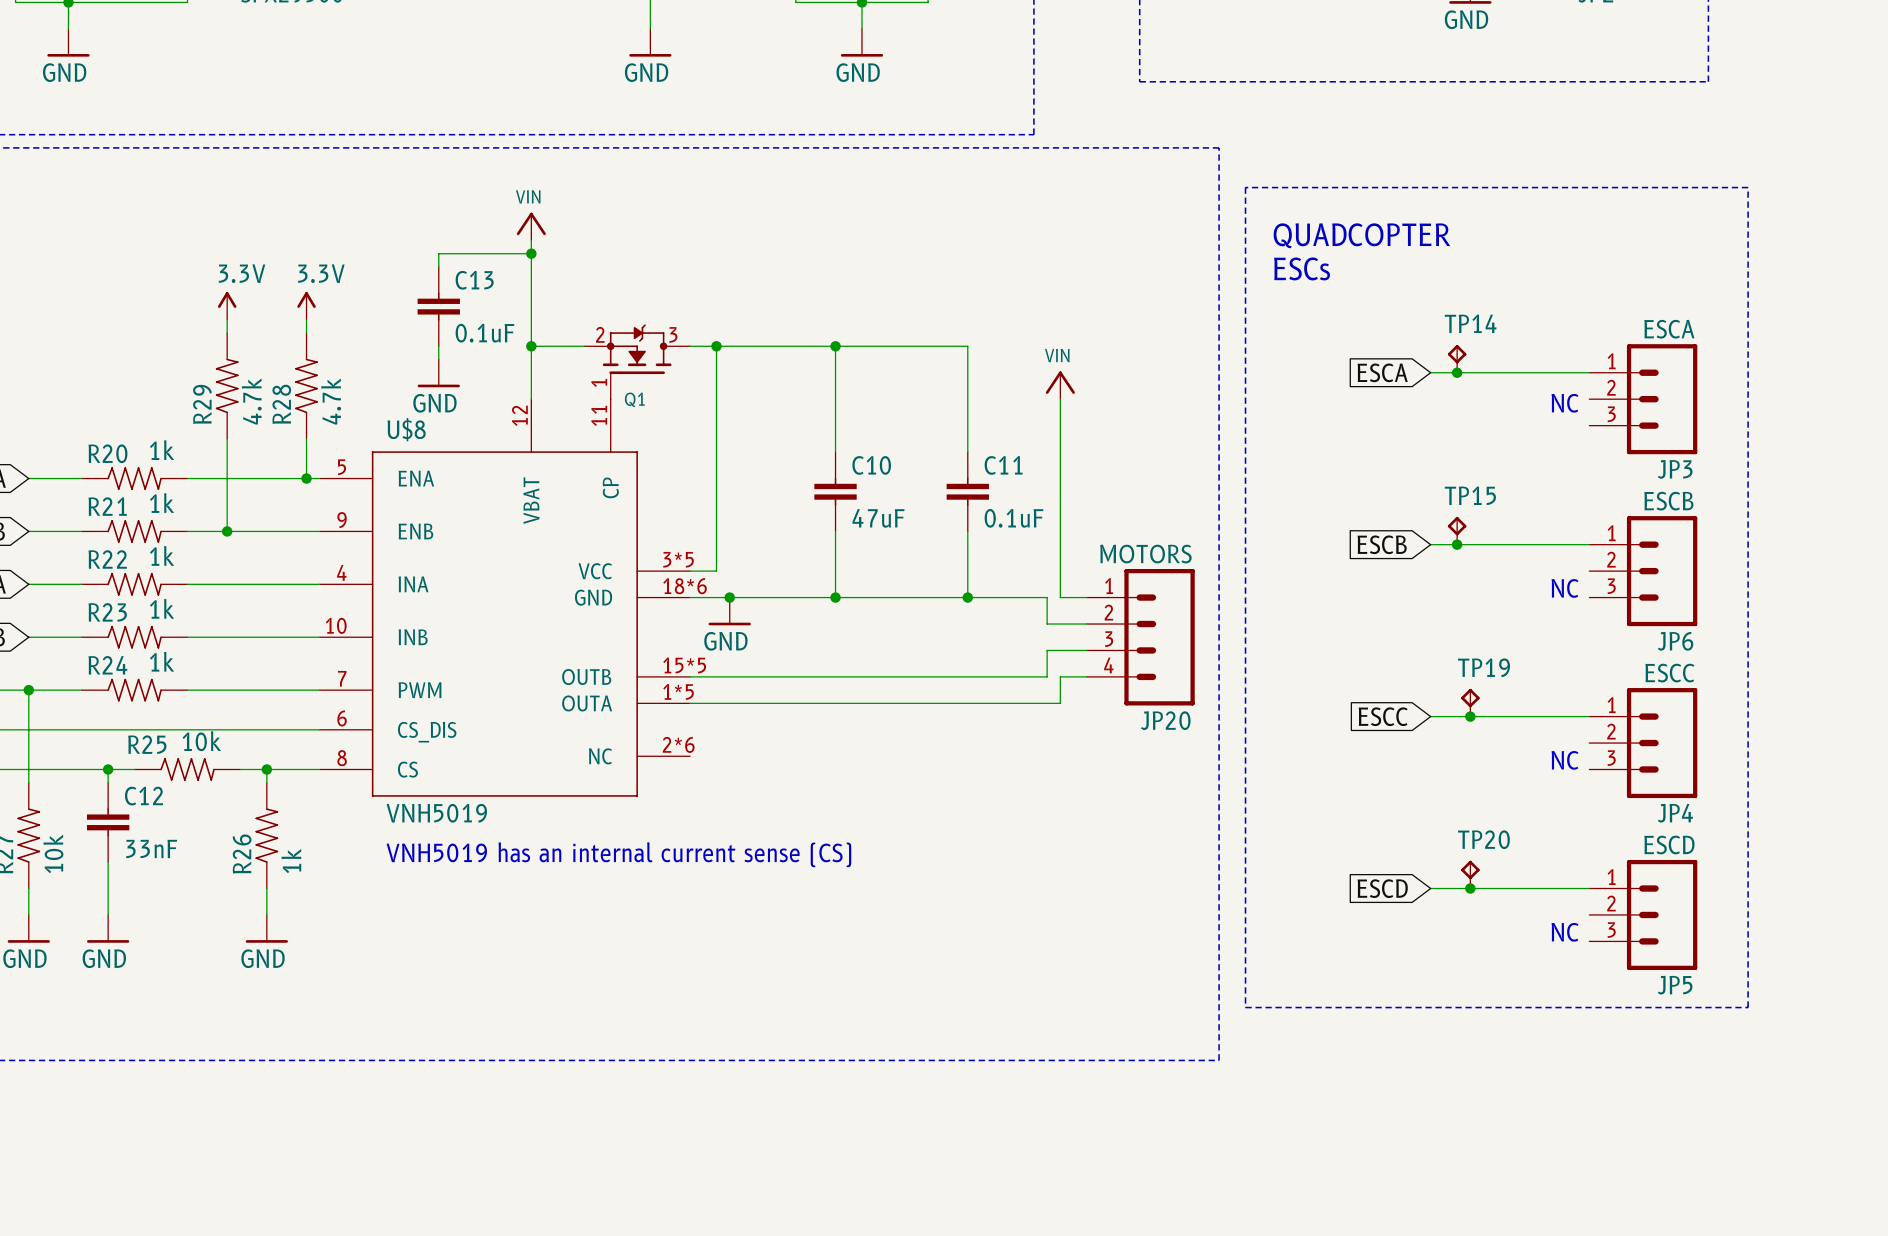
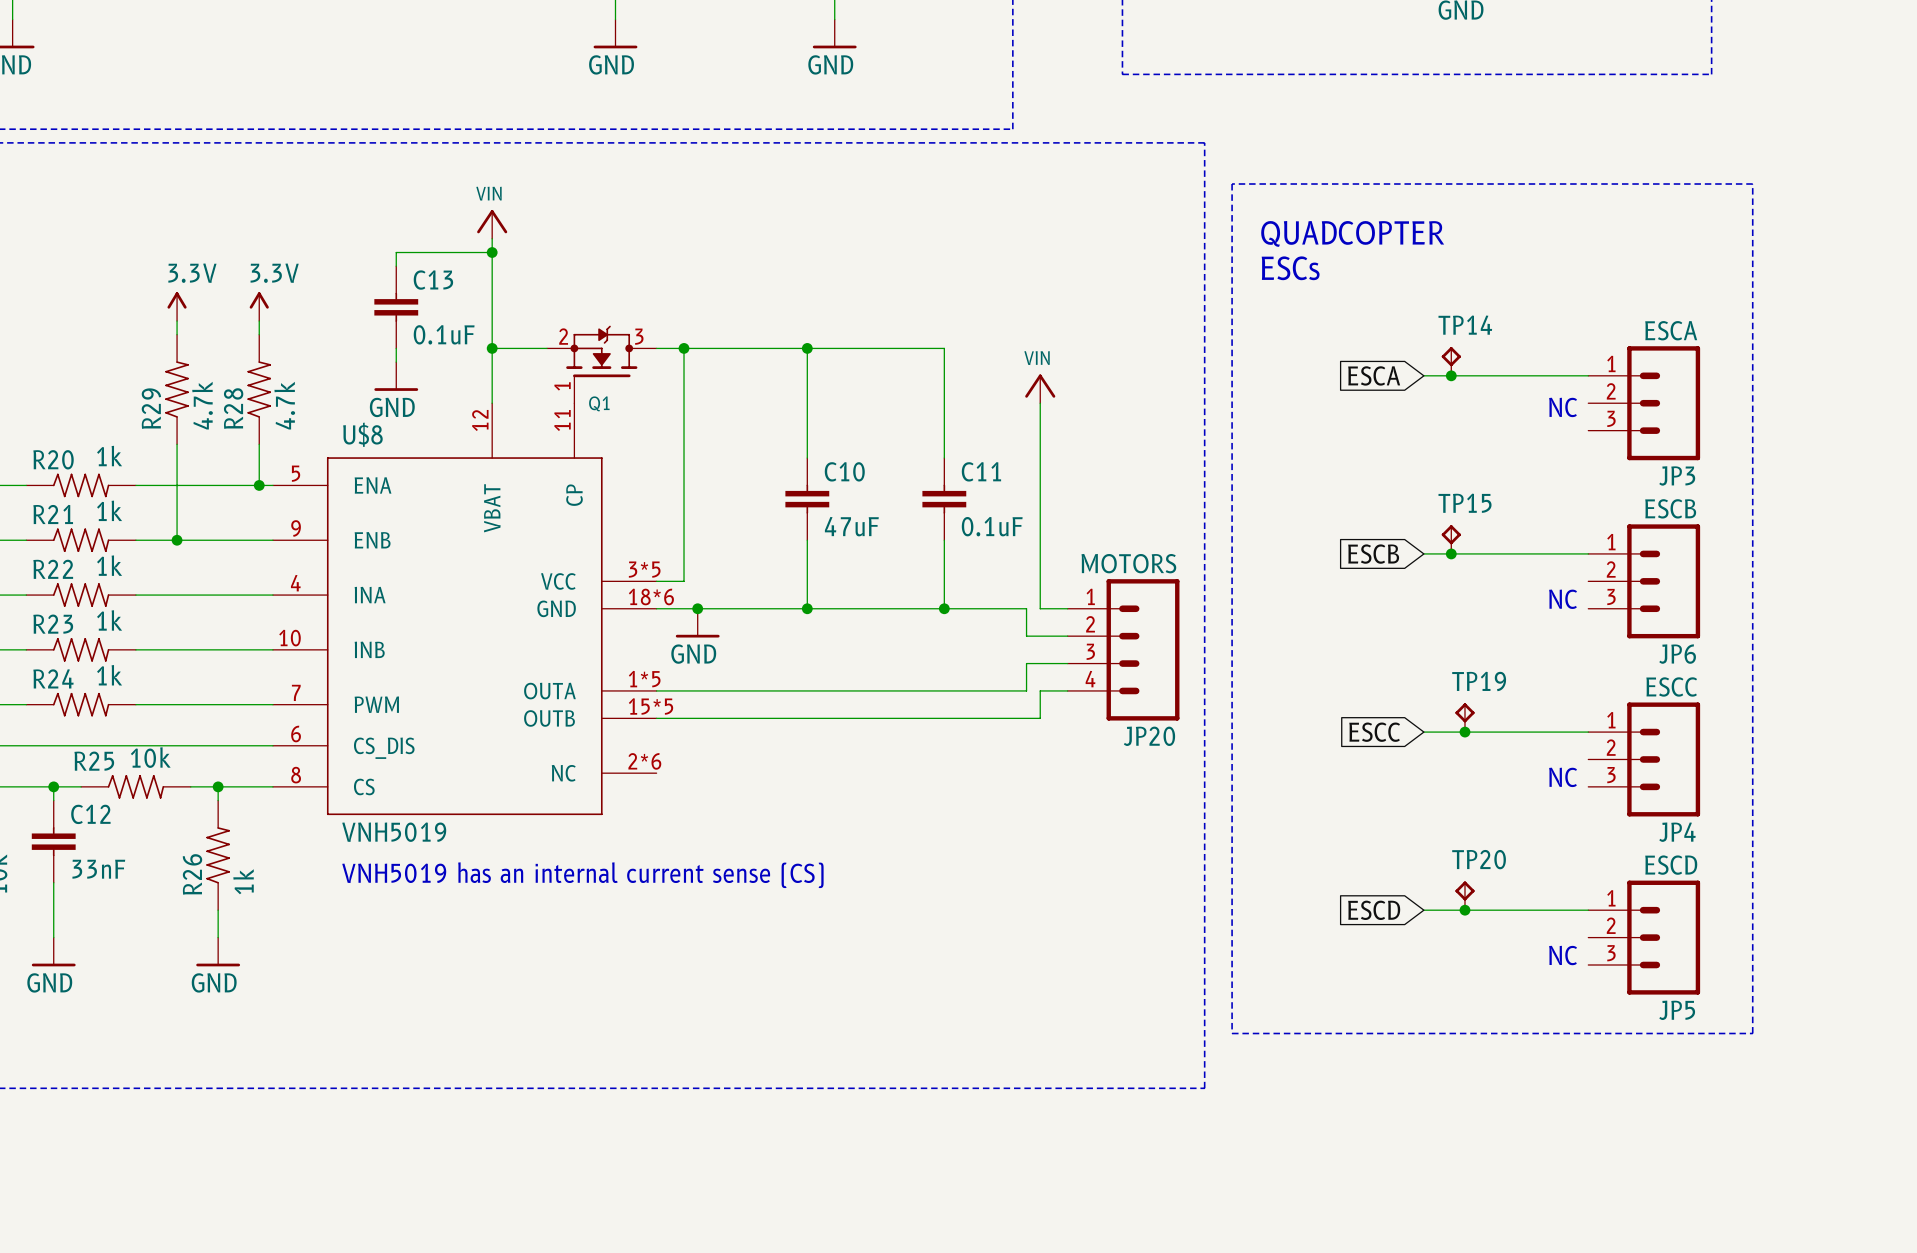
U$8 pin number: 15*5 (684, 665) -> 1*5 (644, 679)
U$8 pin name: OUTB (586, 677) -> OUTA (549, 691)
U$8 pin number: 1*5 (678, 691) -> 15*5 (651, 706)
U$8 pin name: OUTA (587, 703) -> OUTB (549, 718)

